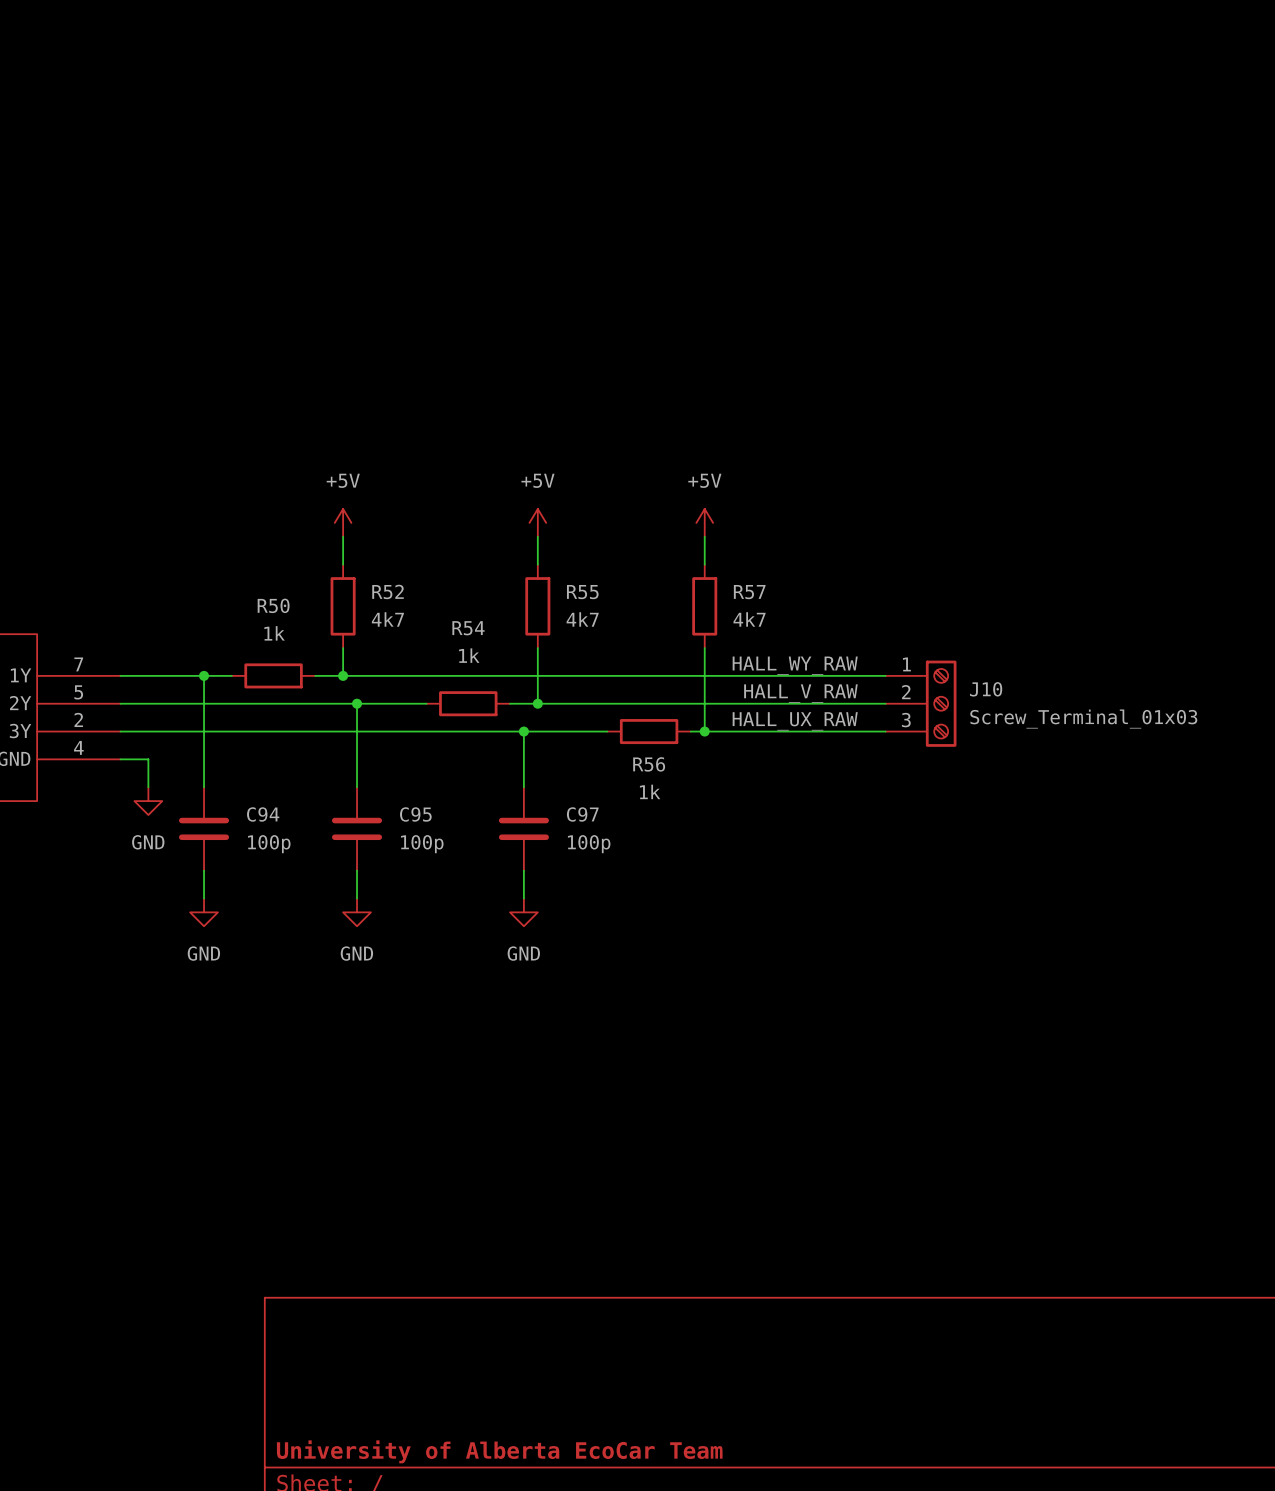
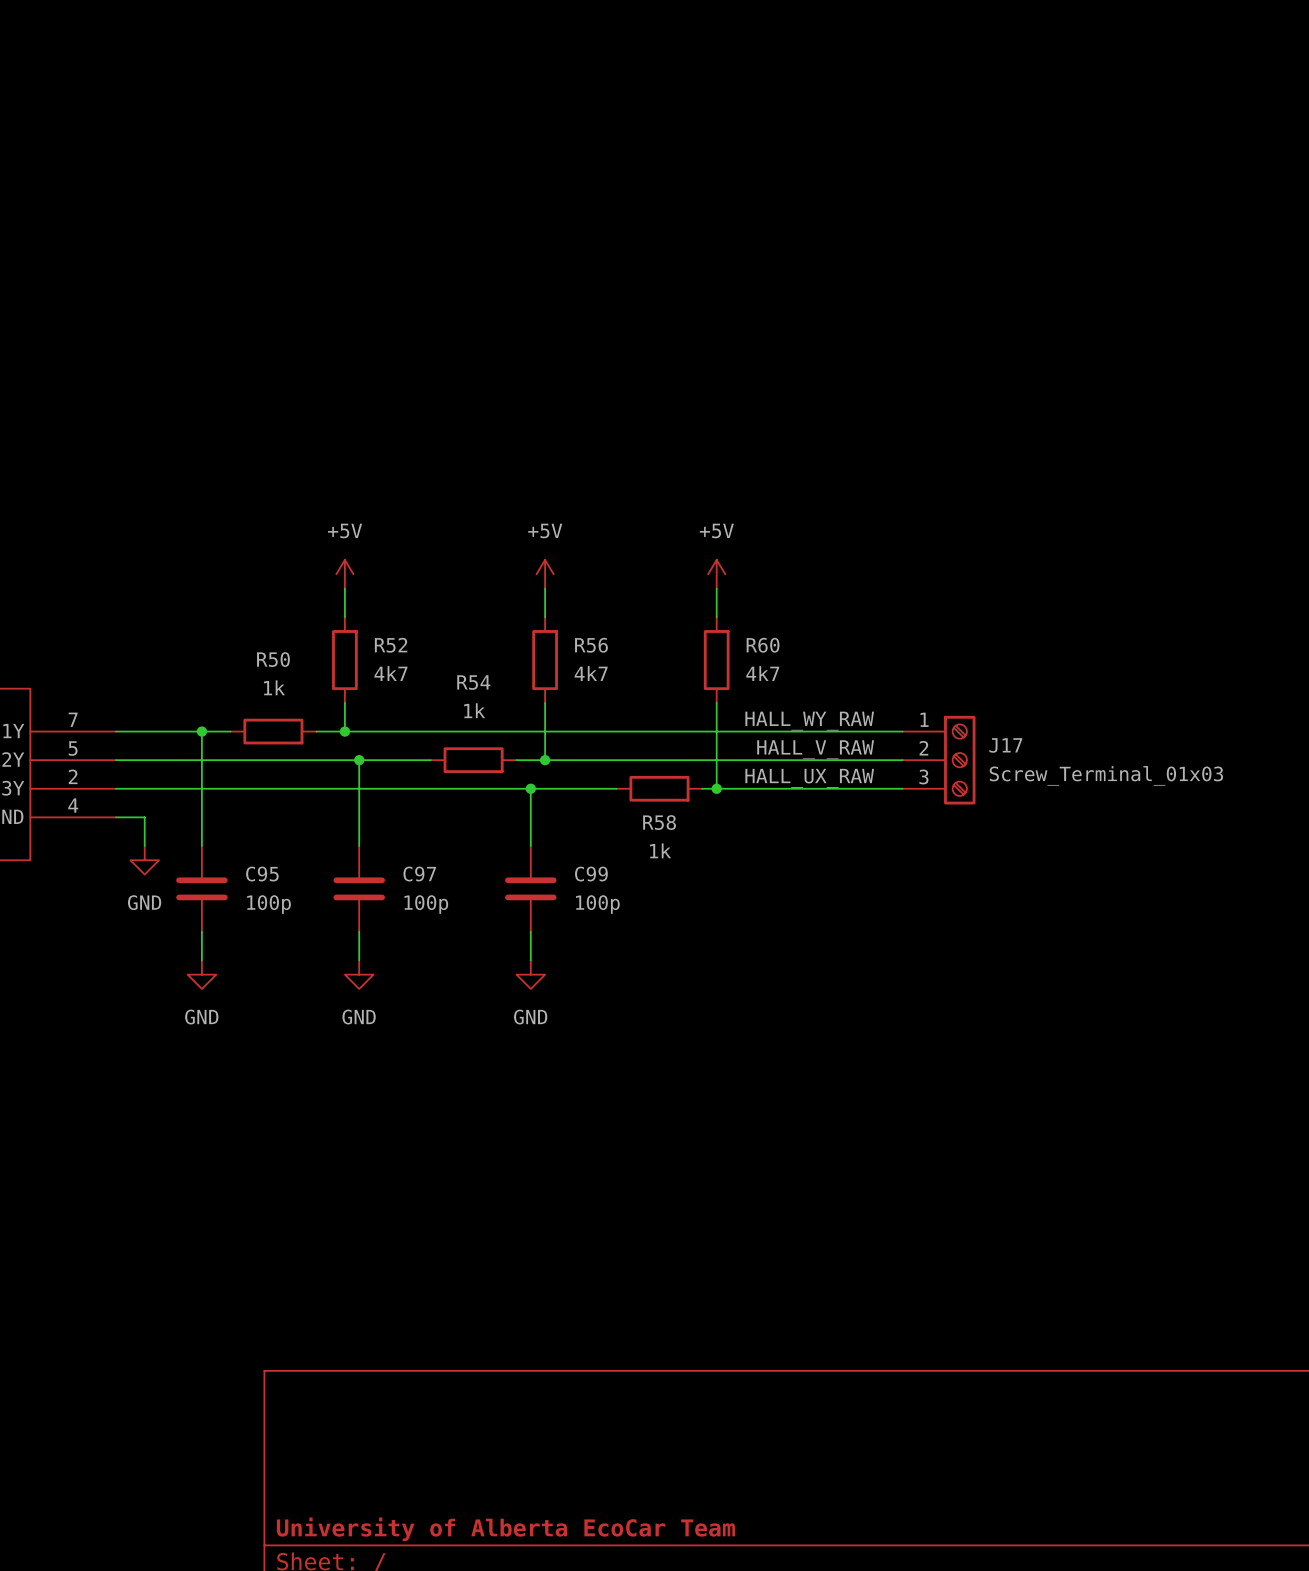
R55 name: R55 (582, 592) -> R56 (591, 645)
R57 name: R57 (749, 592) -> R60 (763, 645)
J10 name: J10 (986, 689) -> J17 (1005, 745)
R56 name: R56 (649, 764) -> R58 (659, 822)
C94 name: C94 (263, 814) -> C95 (262, 874)
C95 name: C95 (415, 814) -> C97 (419, 874)
C97 name: C97 (582, 814) -> C99 (591, 874)

